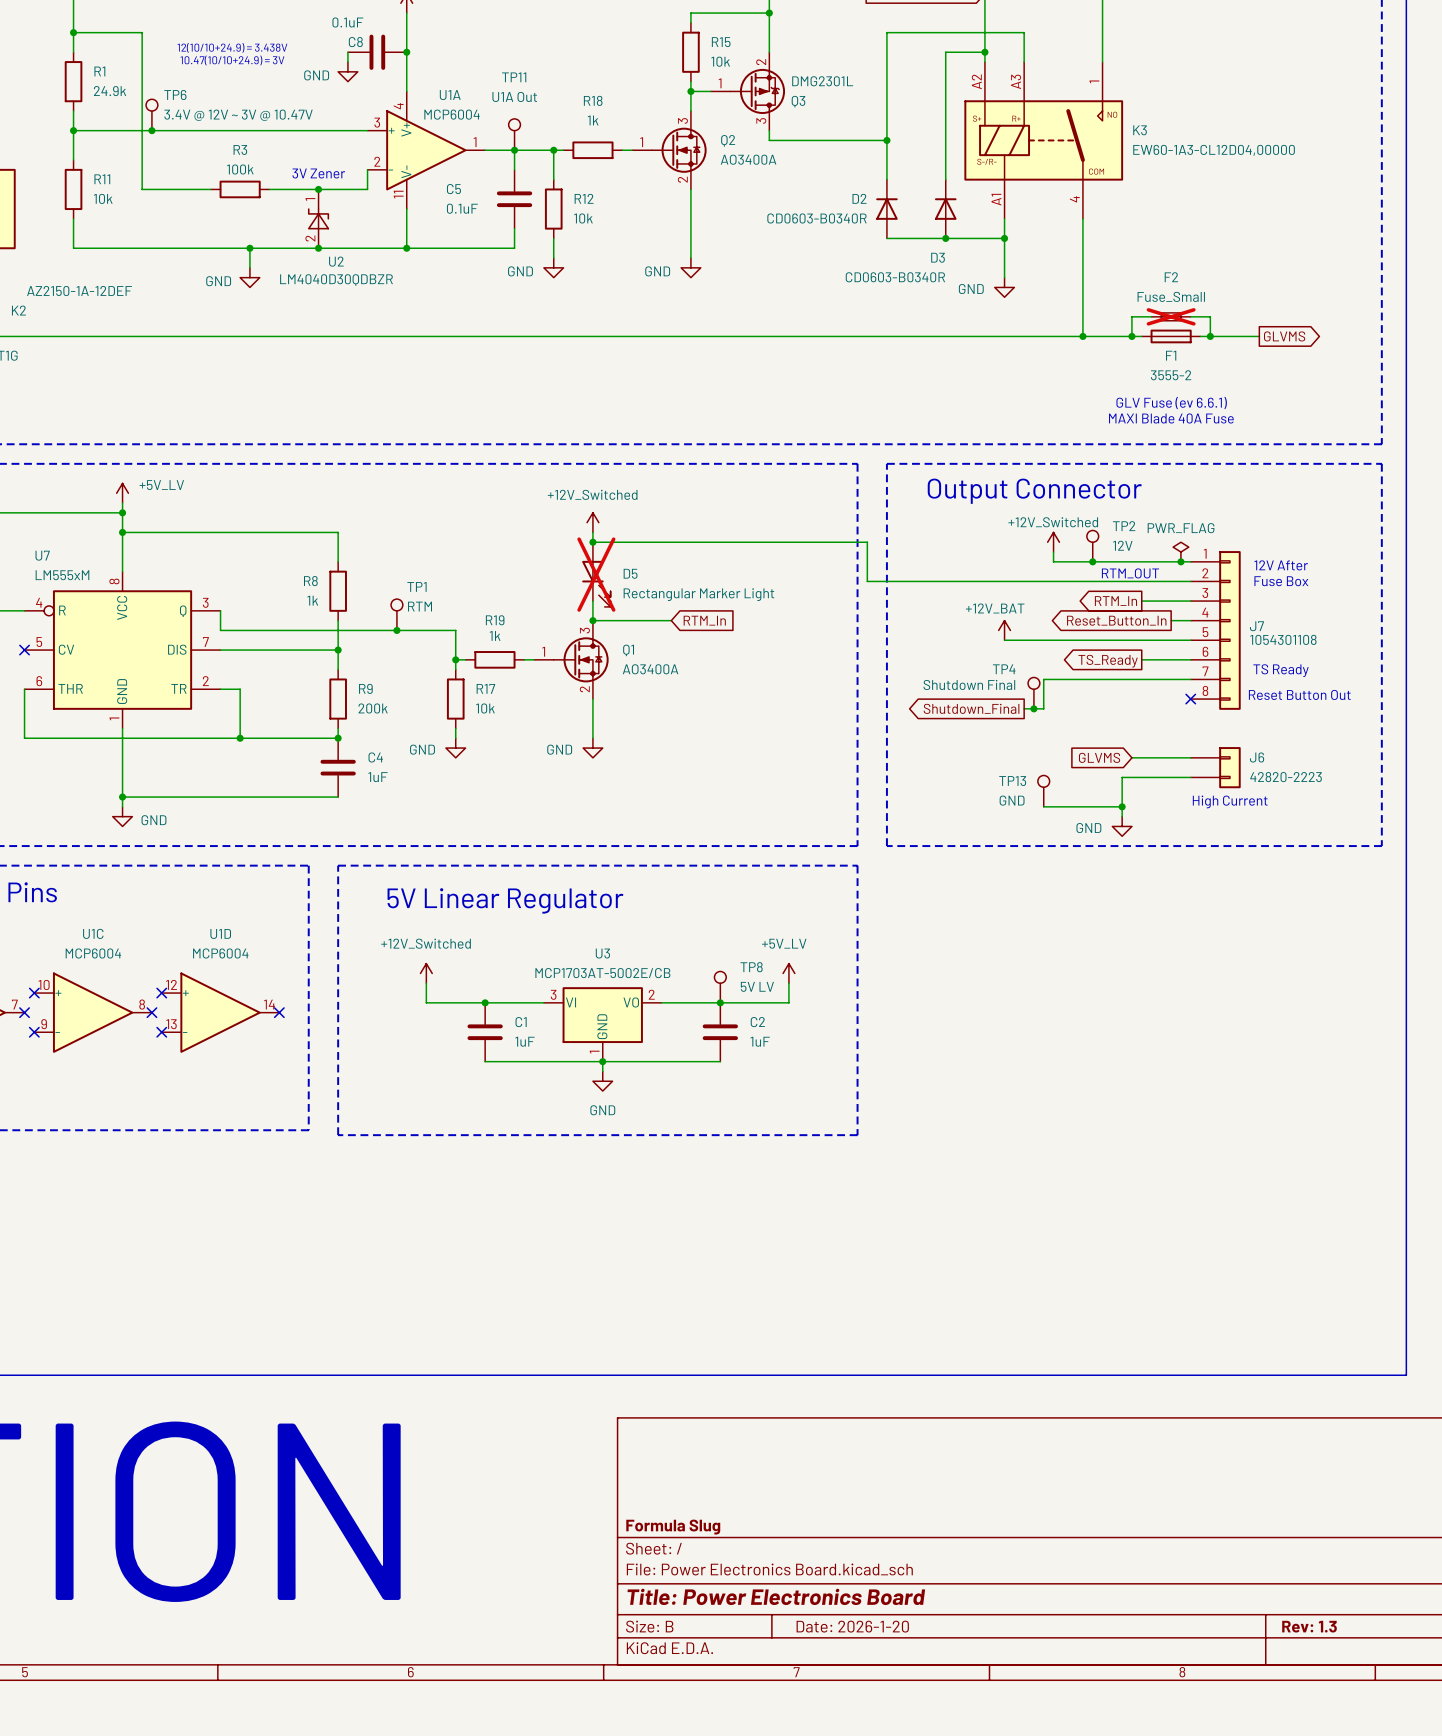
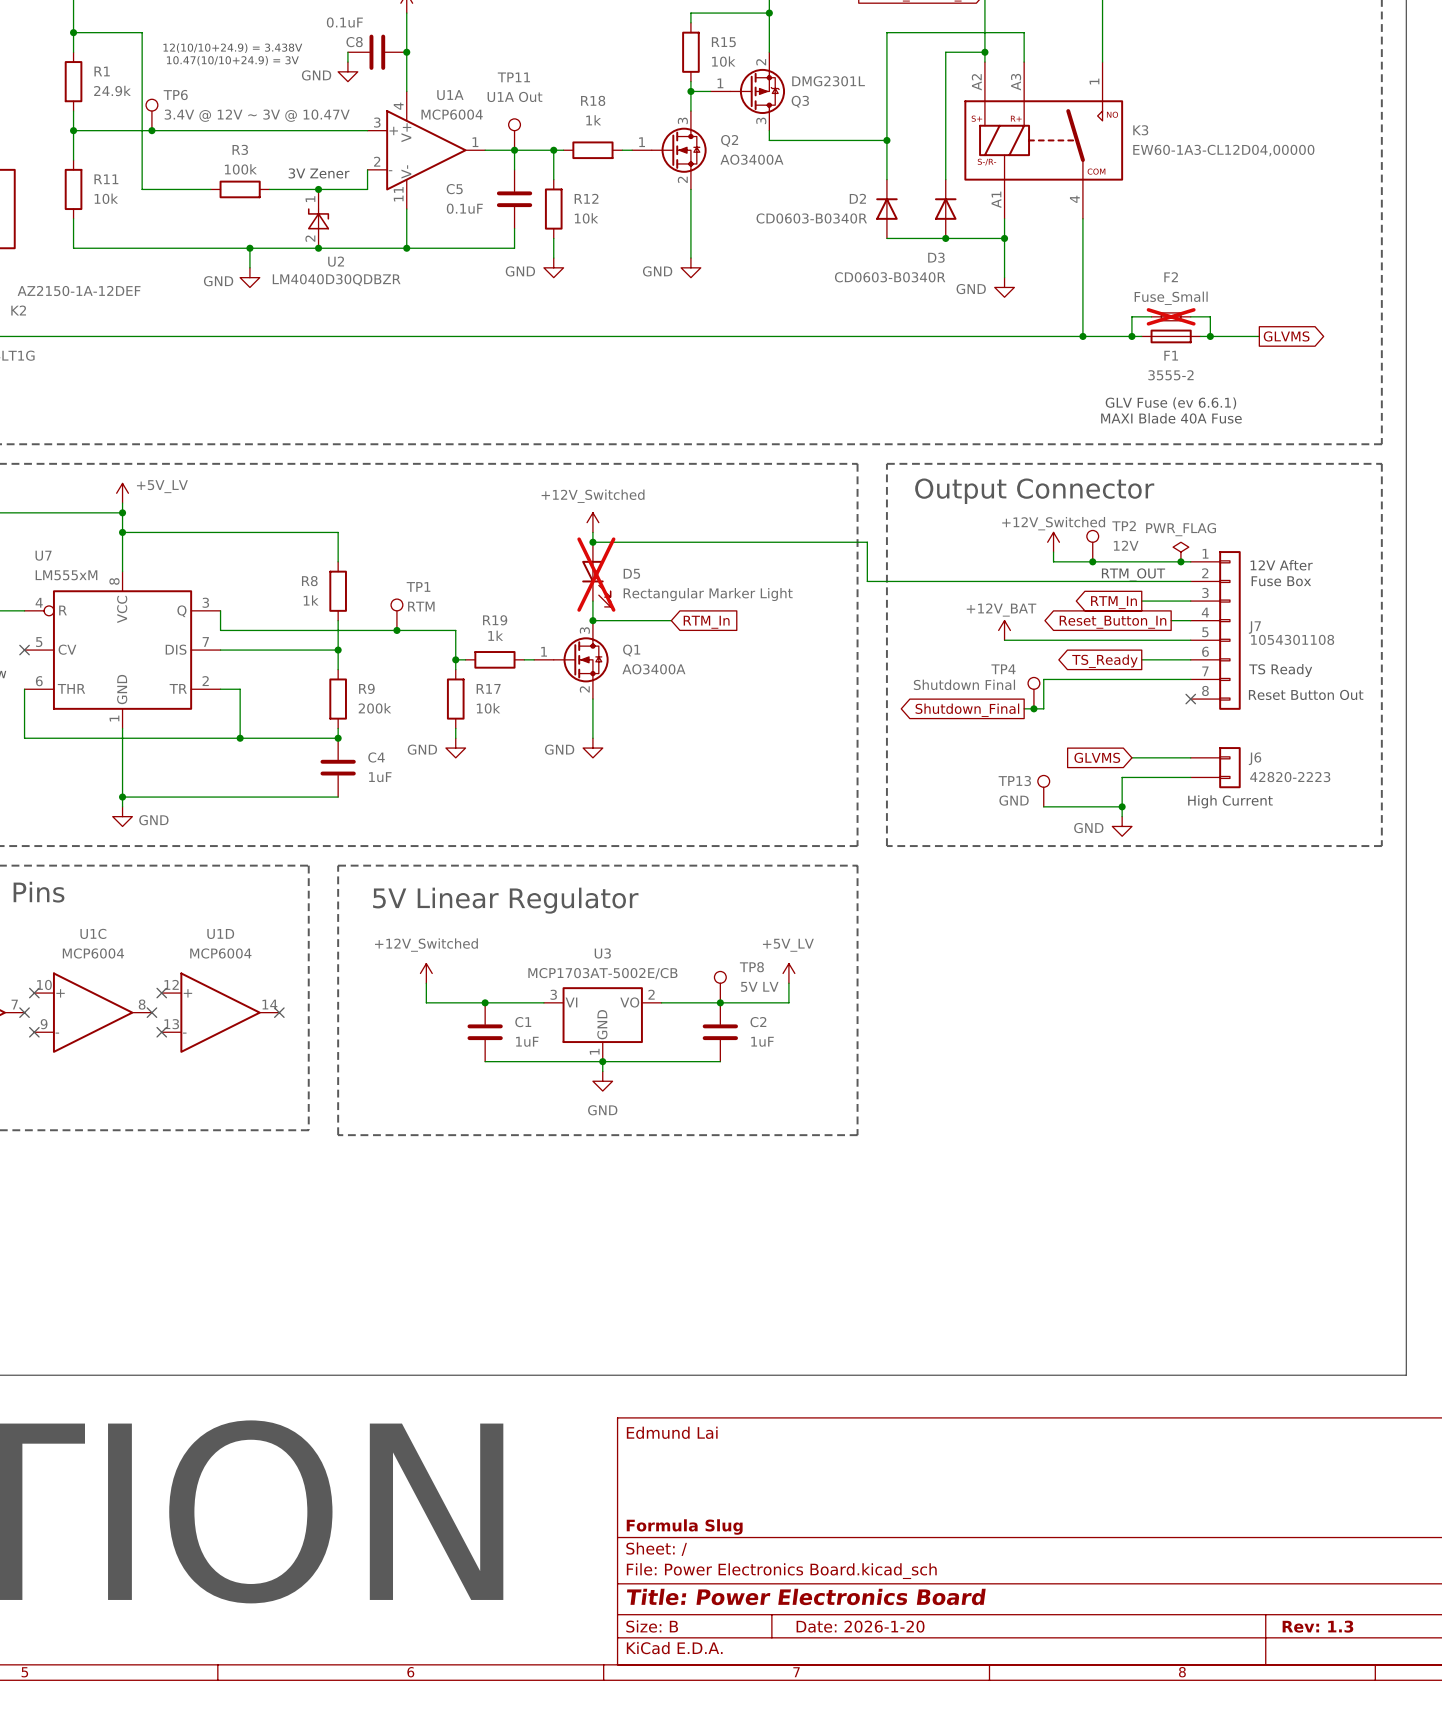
title block: none -> Edmund Lai (672, 1432)

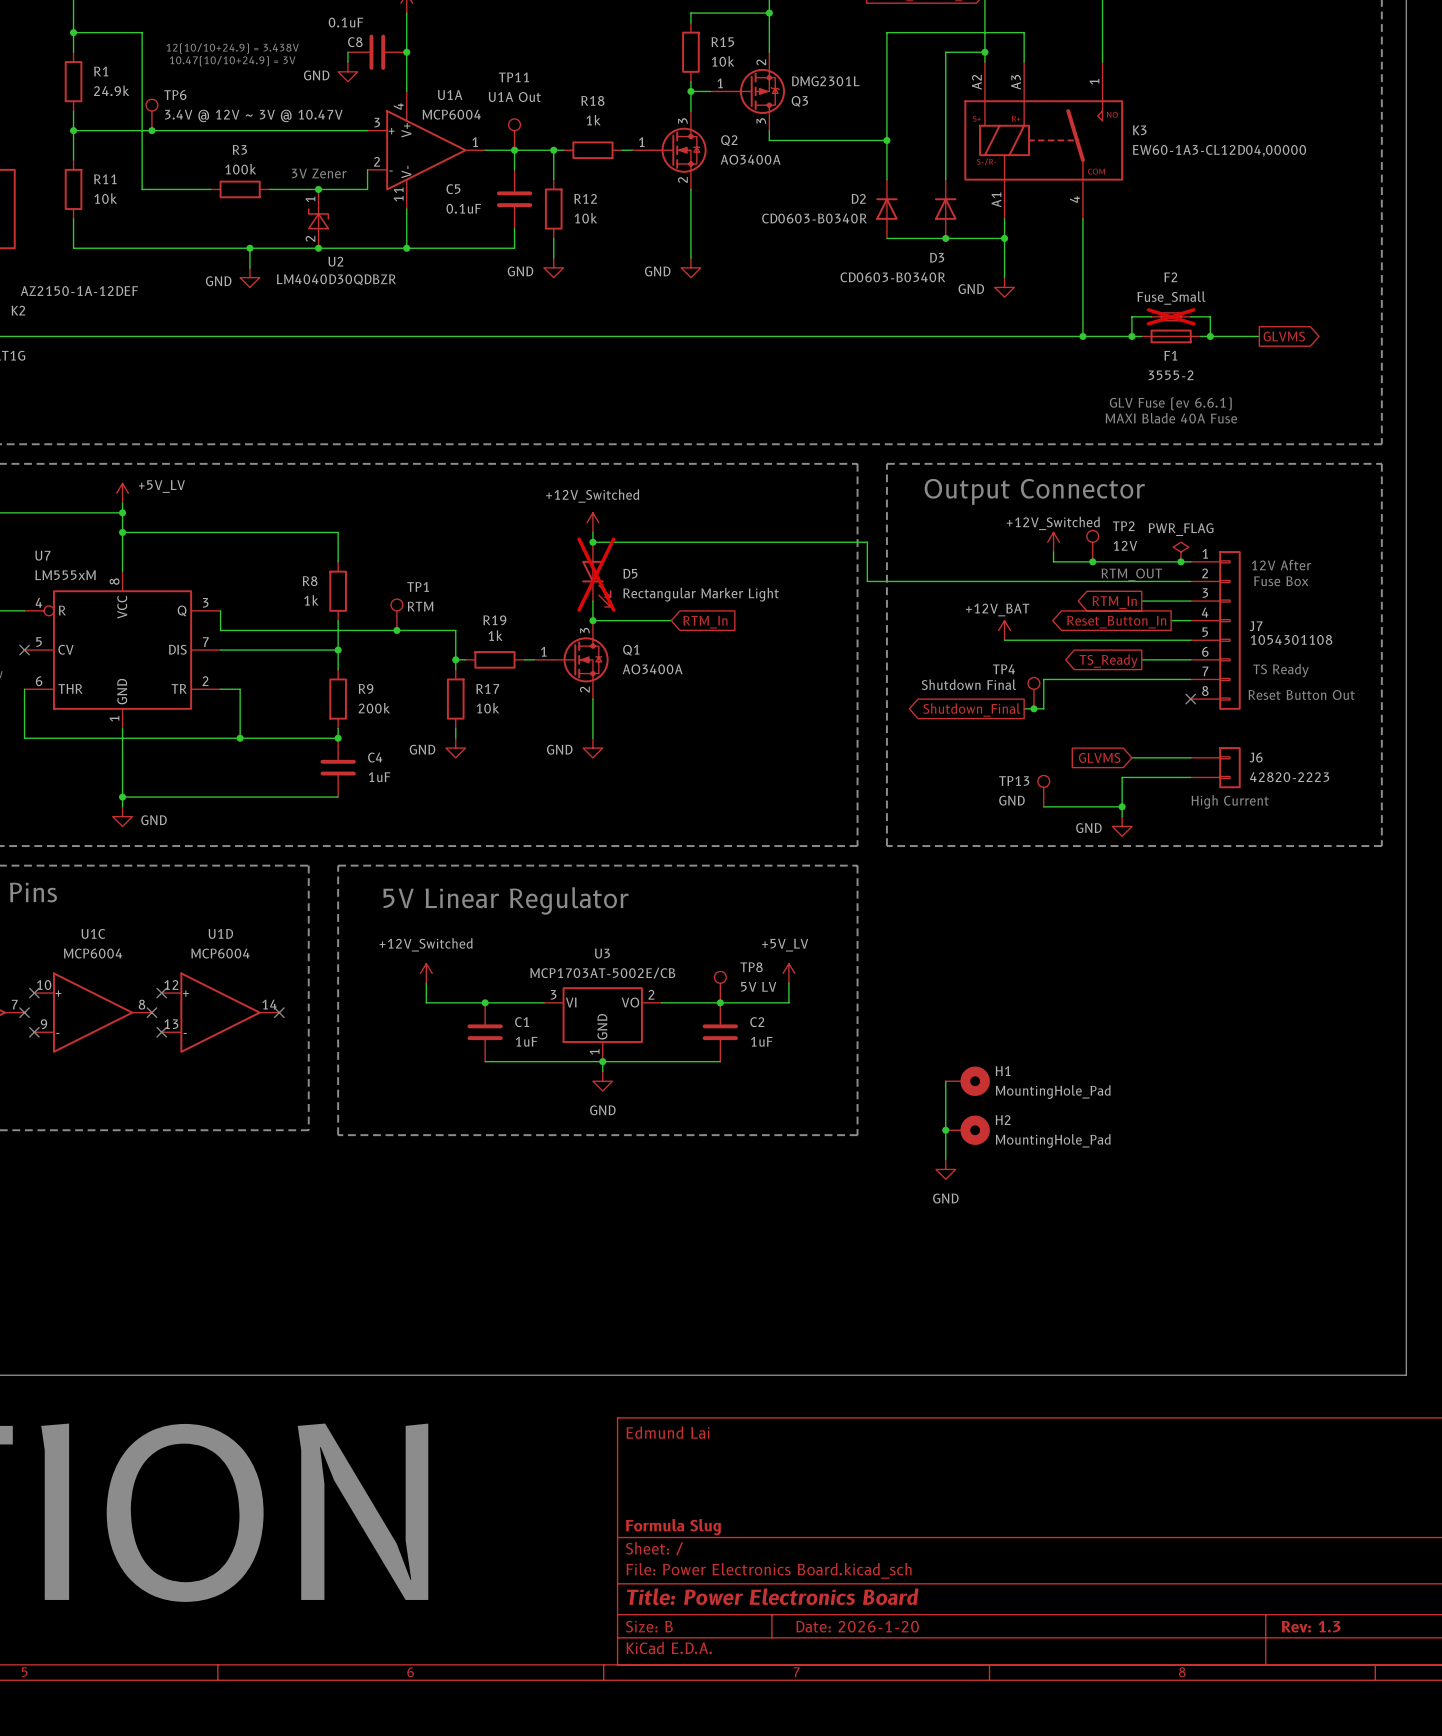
wire: none -> (945, 1081) (945, 1159)
H1: none -> MountingHole_Pad (967, 1081)
junction: none -> (945, 1130)
H2: none -> MountingHole_Pad (967, 1130)
power symbol: none -> GND (945, 1169)

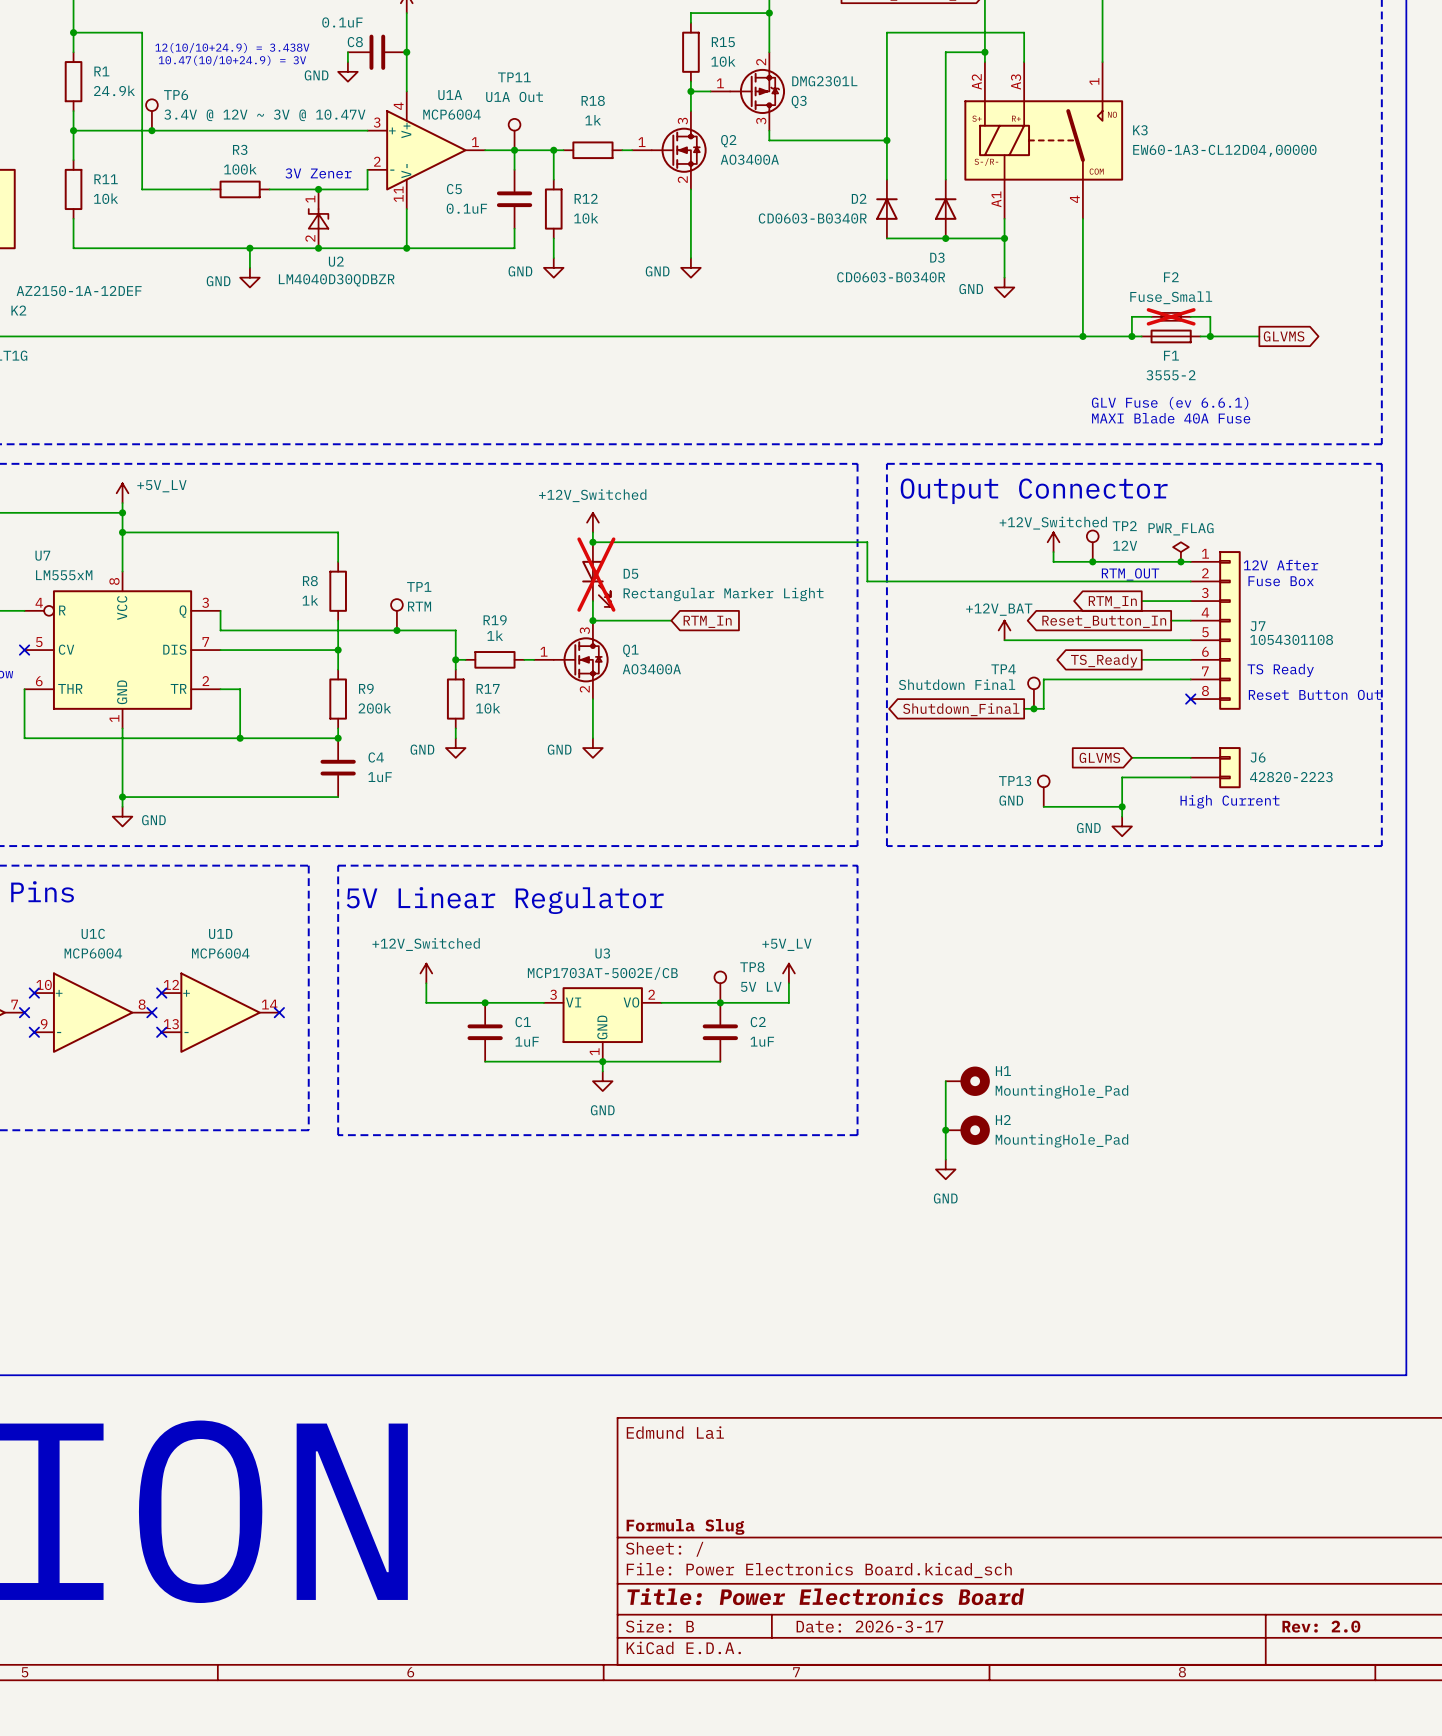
title block: Date: 2026-1-20 (857, 1626) -> Date: 2026-3-17 (869, 1626)
title block: Rev: 1.3 (1311, 1626) -> Rev: 2.0 (1321, 1626)

